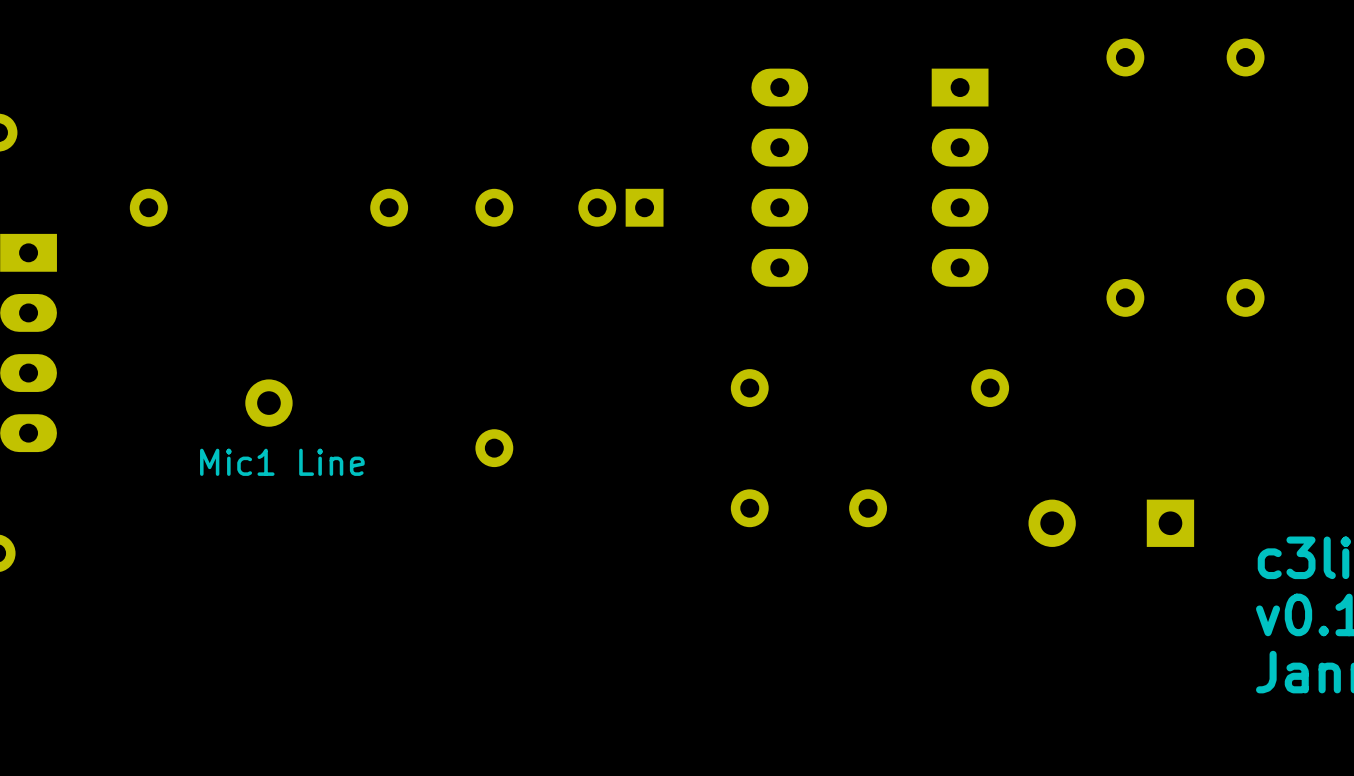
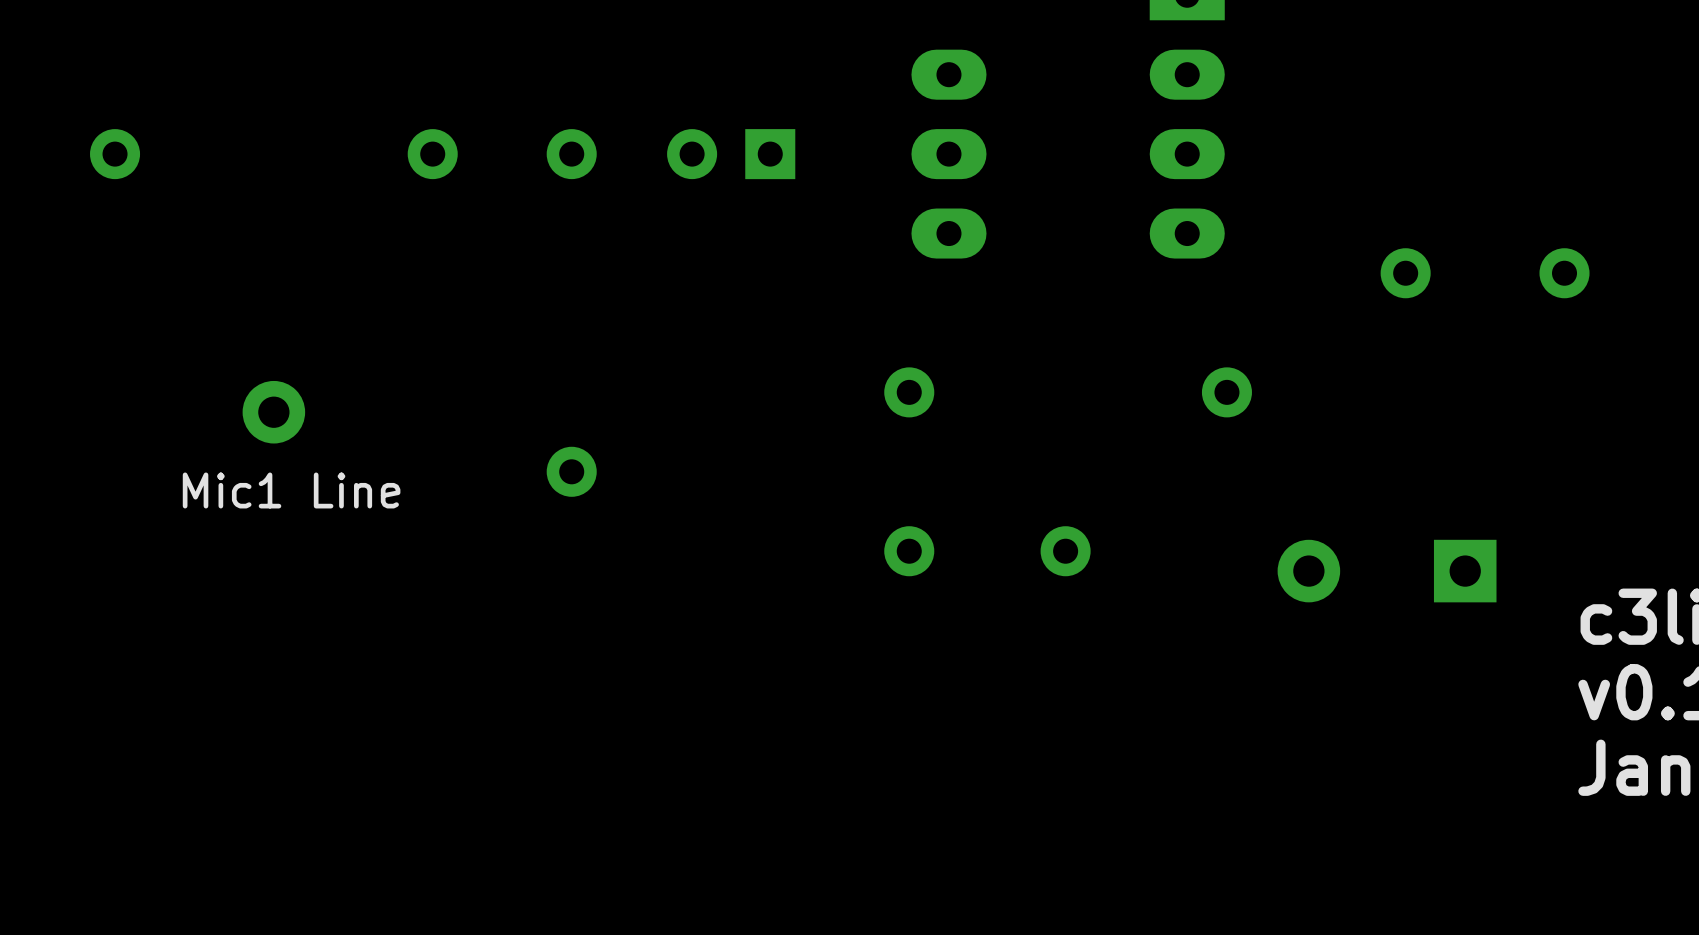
part footprint: [578, 188, 664, 227] -> [667, 129, 796, 180]

